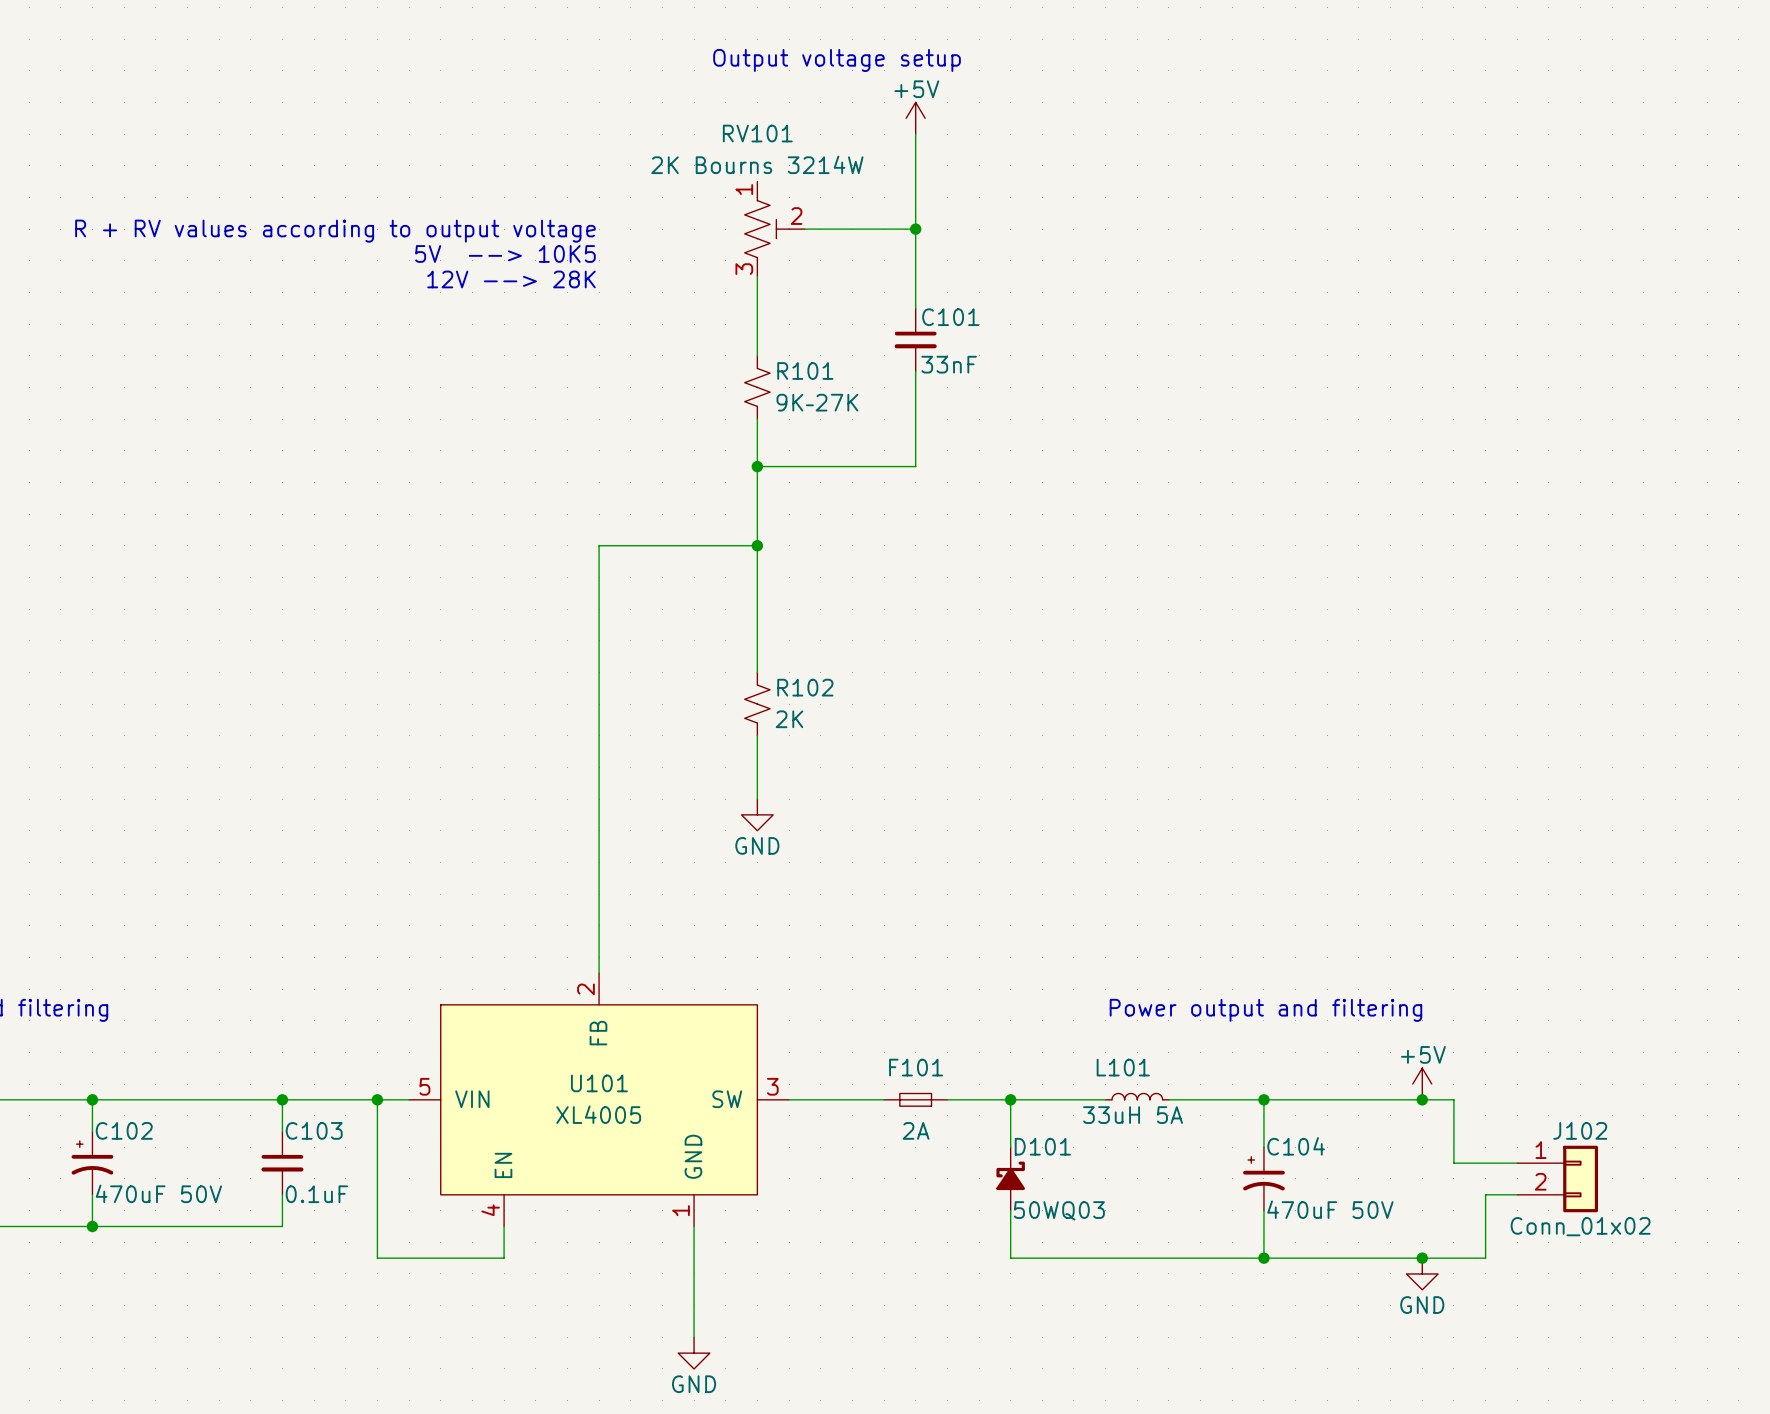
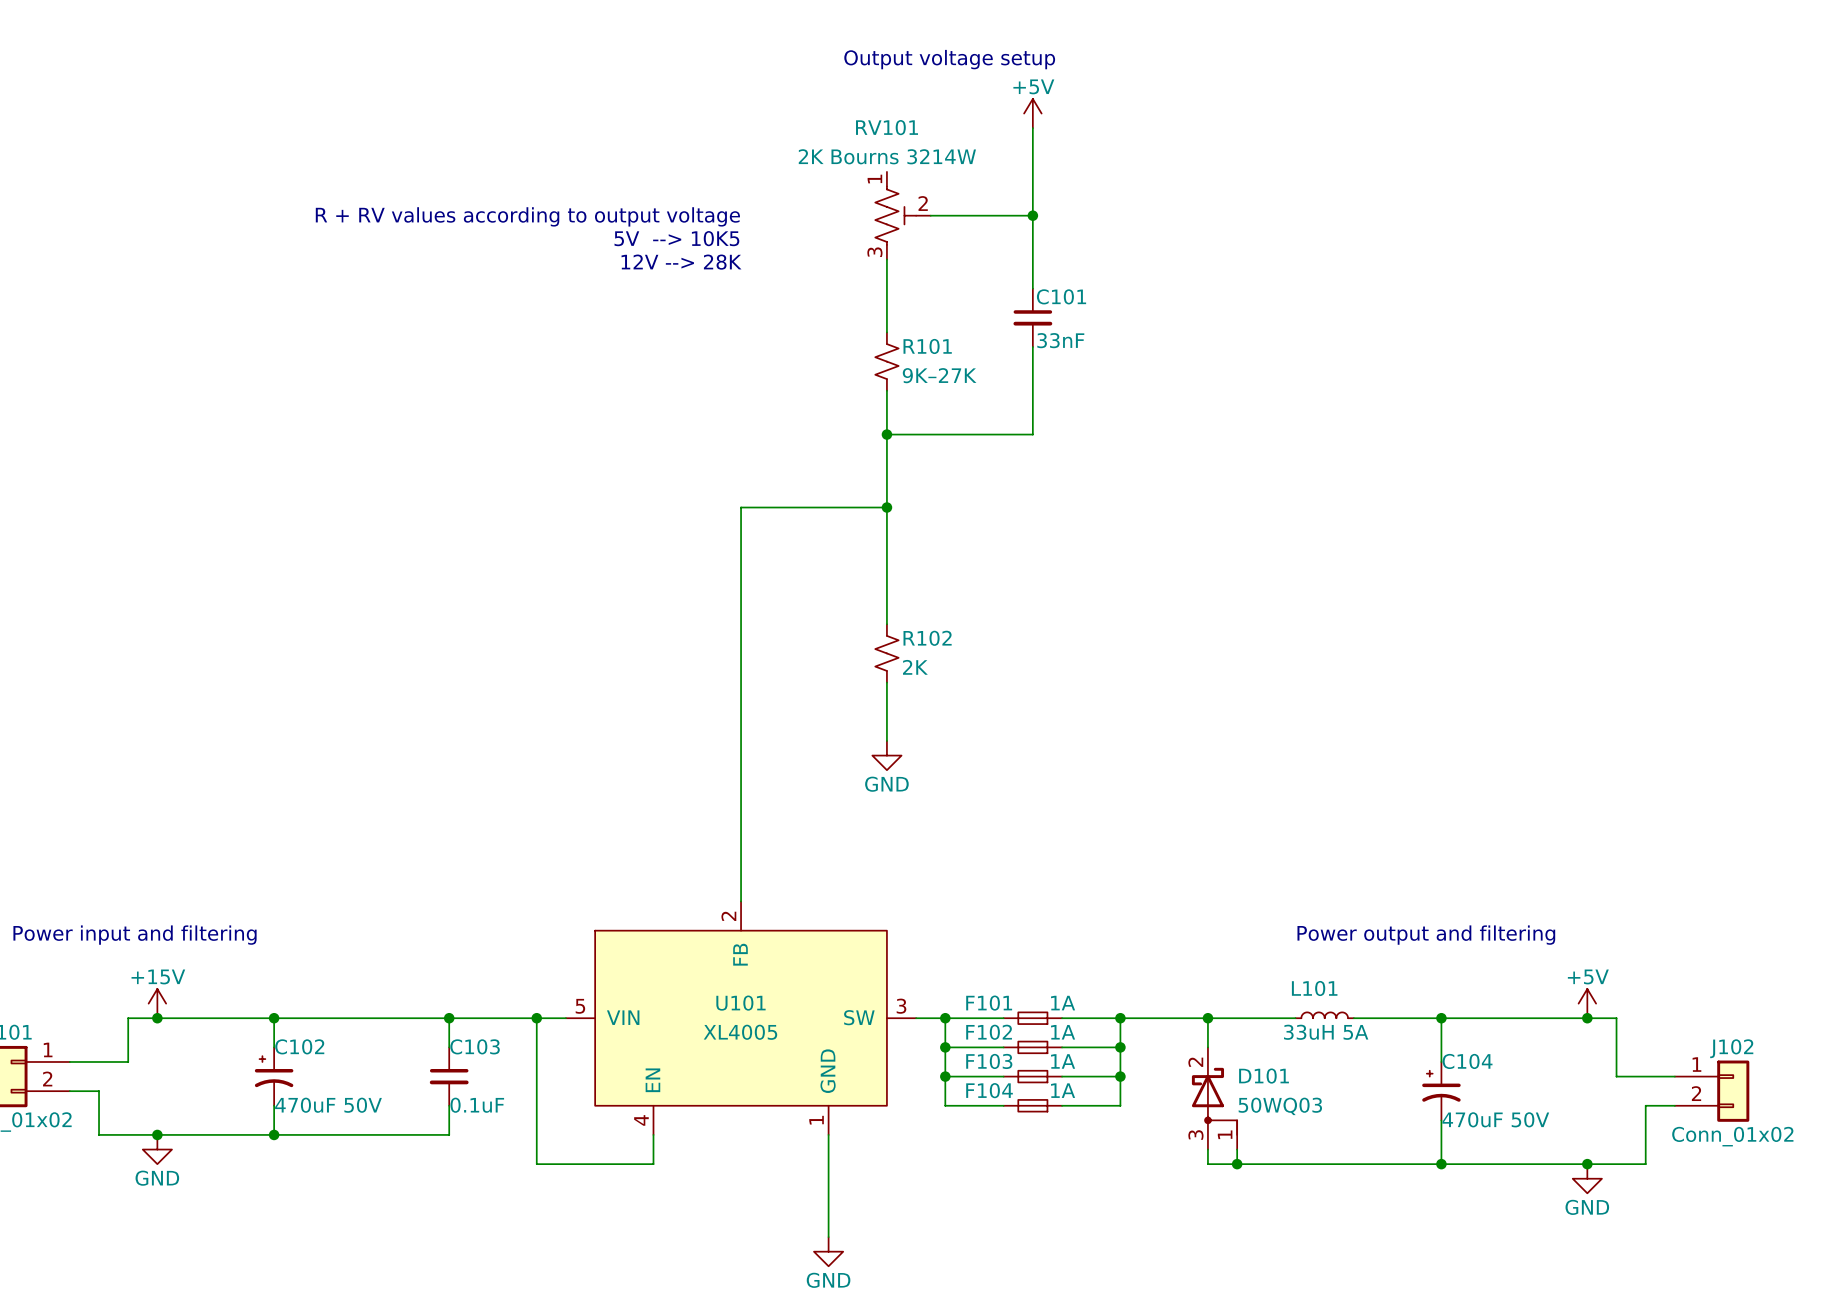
text position: Power output and filtering (1265, 1010) -> Power output and filtering (1426, 935)
F101 name position: F101 (916, 1067) -> F101 (989, 1003)
power symbol position: +5V (1422, 1084) -> +5V (1587, 1003)
L101 position: (1137, 1096) -> (1324, 1015)
wire: none -> (945, 1018) (945, 1105) (1003, 1105)
junction: none -> (945, 1018)
junction: none -> (1207, 1018)
wire: none -> (1266, 1018) (1207, 1018) (1207, 1047)
wire: (1200, 1099) (1263, 1099) (1263, 1147) -> none
junction: (1263, 1099) -> none
wire: none -> (1441, 1018) (1441, 1061)
junction: none -> (1441, 1018)
junction: (1422, 1099) -> none
wire: (1453, 1099) (1453, 1163) (1517, 1163) -> (1528, 1018) (1616, 1018) (1616, 1076) (1674, 1076)
junction: none -> (1587, 1018)
F101 value: 2A (916, 1130) -> 1A (1063, 1003)
wire: none -> (945, 1047) (1003, 1047)
junction: none -> (945, 1047)
F102: none -> 1A (1032, 1047)
wire: none -> (1062, 1047) (1120, 1047)
junction: none -> (1120, 1047)
D101 name position: D101 (1042, 1146) -> D101 (1264, 1076)
D101 symbol: [996, 1147, 1025, 1211] -> [1191, 1047, 1238, 1150]
wire: none -> (1120, 1061) (1120, 1105) (1062, 1105)
wire: none -> (945, 1076) (1003, 1076)
junction: none -> (945, 1076)
F103: none -> 1A (1032, 1076)
wire: none -> (1062, 1076) (1120, 1076)
junction: none -> (1120, 1076)
C104 position: (1263, 1178) -> (1441, 1091)
J102 position: (1557, 1178) -> (1712, 1091)
F104: none -> 1A (1032, 1105)
wire: (1517, 1194) (1485, 1194) (1485, 1258) -> (1674, 1105) (1645, 1105) (1645, 1164) (1558, 1164)
wire: (1010, 1210) (1010, 1258) (1105, 1258) -> (1207, 1149) (1207, 1164)
D101 value position: 50WQ03 (1059, 1210) -> 50WQ03 (1280, 1106)
wire: (1263, 1210) (1263, 1258) -> (1441, 1120) (1441, 1164)
wire: none -> (1237, 1149) (1237, 1164)
junction: none -> (1237, 1164)
junction: (1263, 1258) -> none
junction: none -> (1441, 1164)
junction: (1422, 1258) -> none
junction: none -> (1587, 1164)
power symbol position: GND (1422, 1273) -> GND (1587, 1178)

